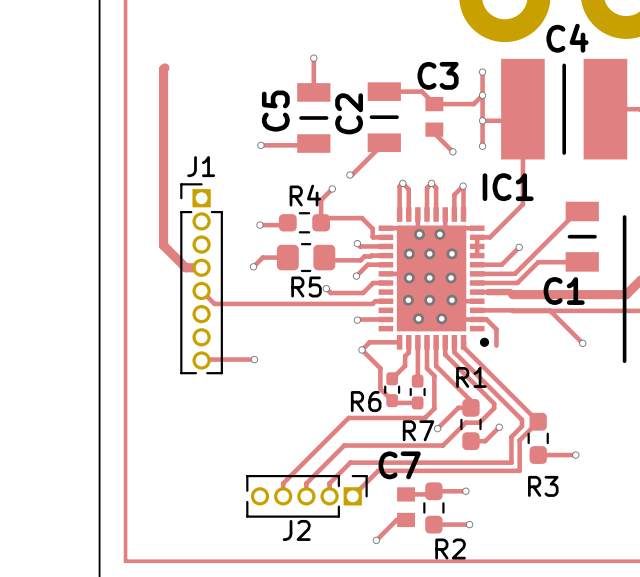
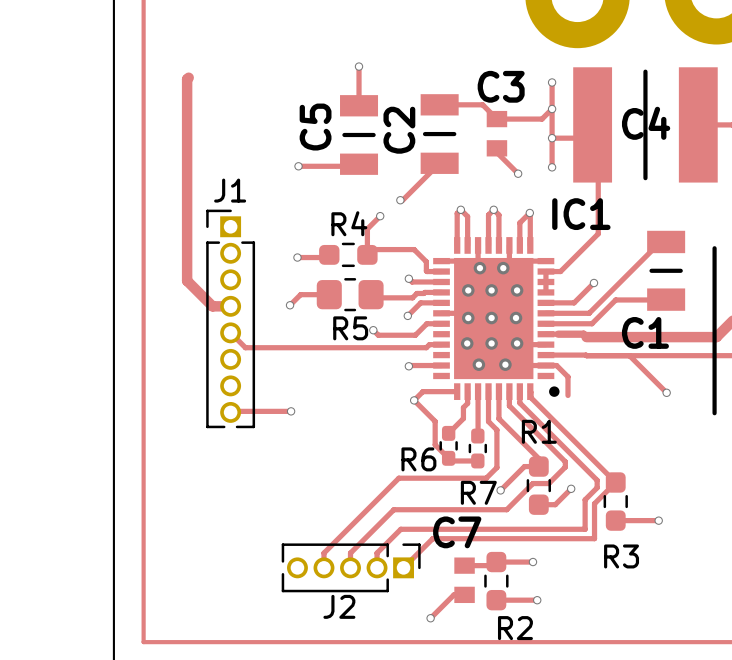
C4 name position: C4 (567, 38) -> C4 (646, 123)
C4 footprint: [501, 58, 628, 160] -> [573, 67, 718, 183]

